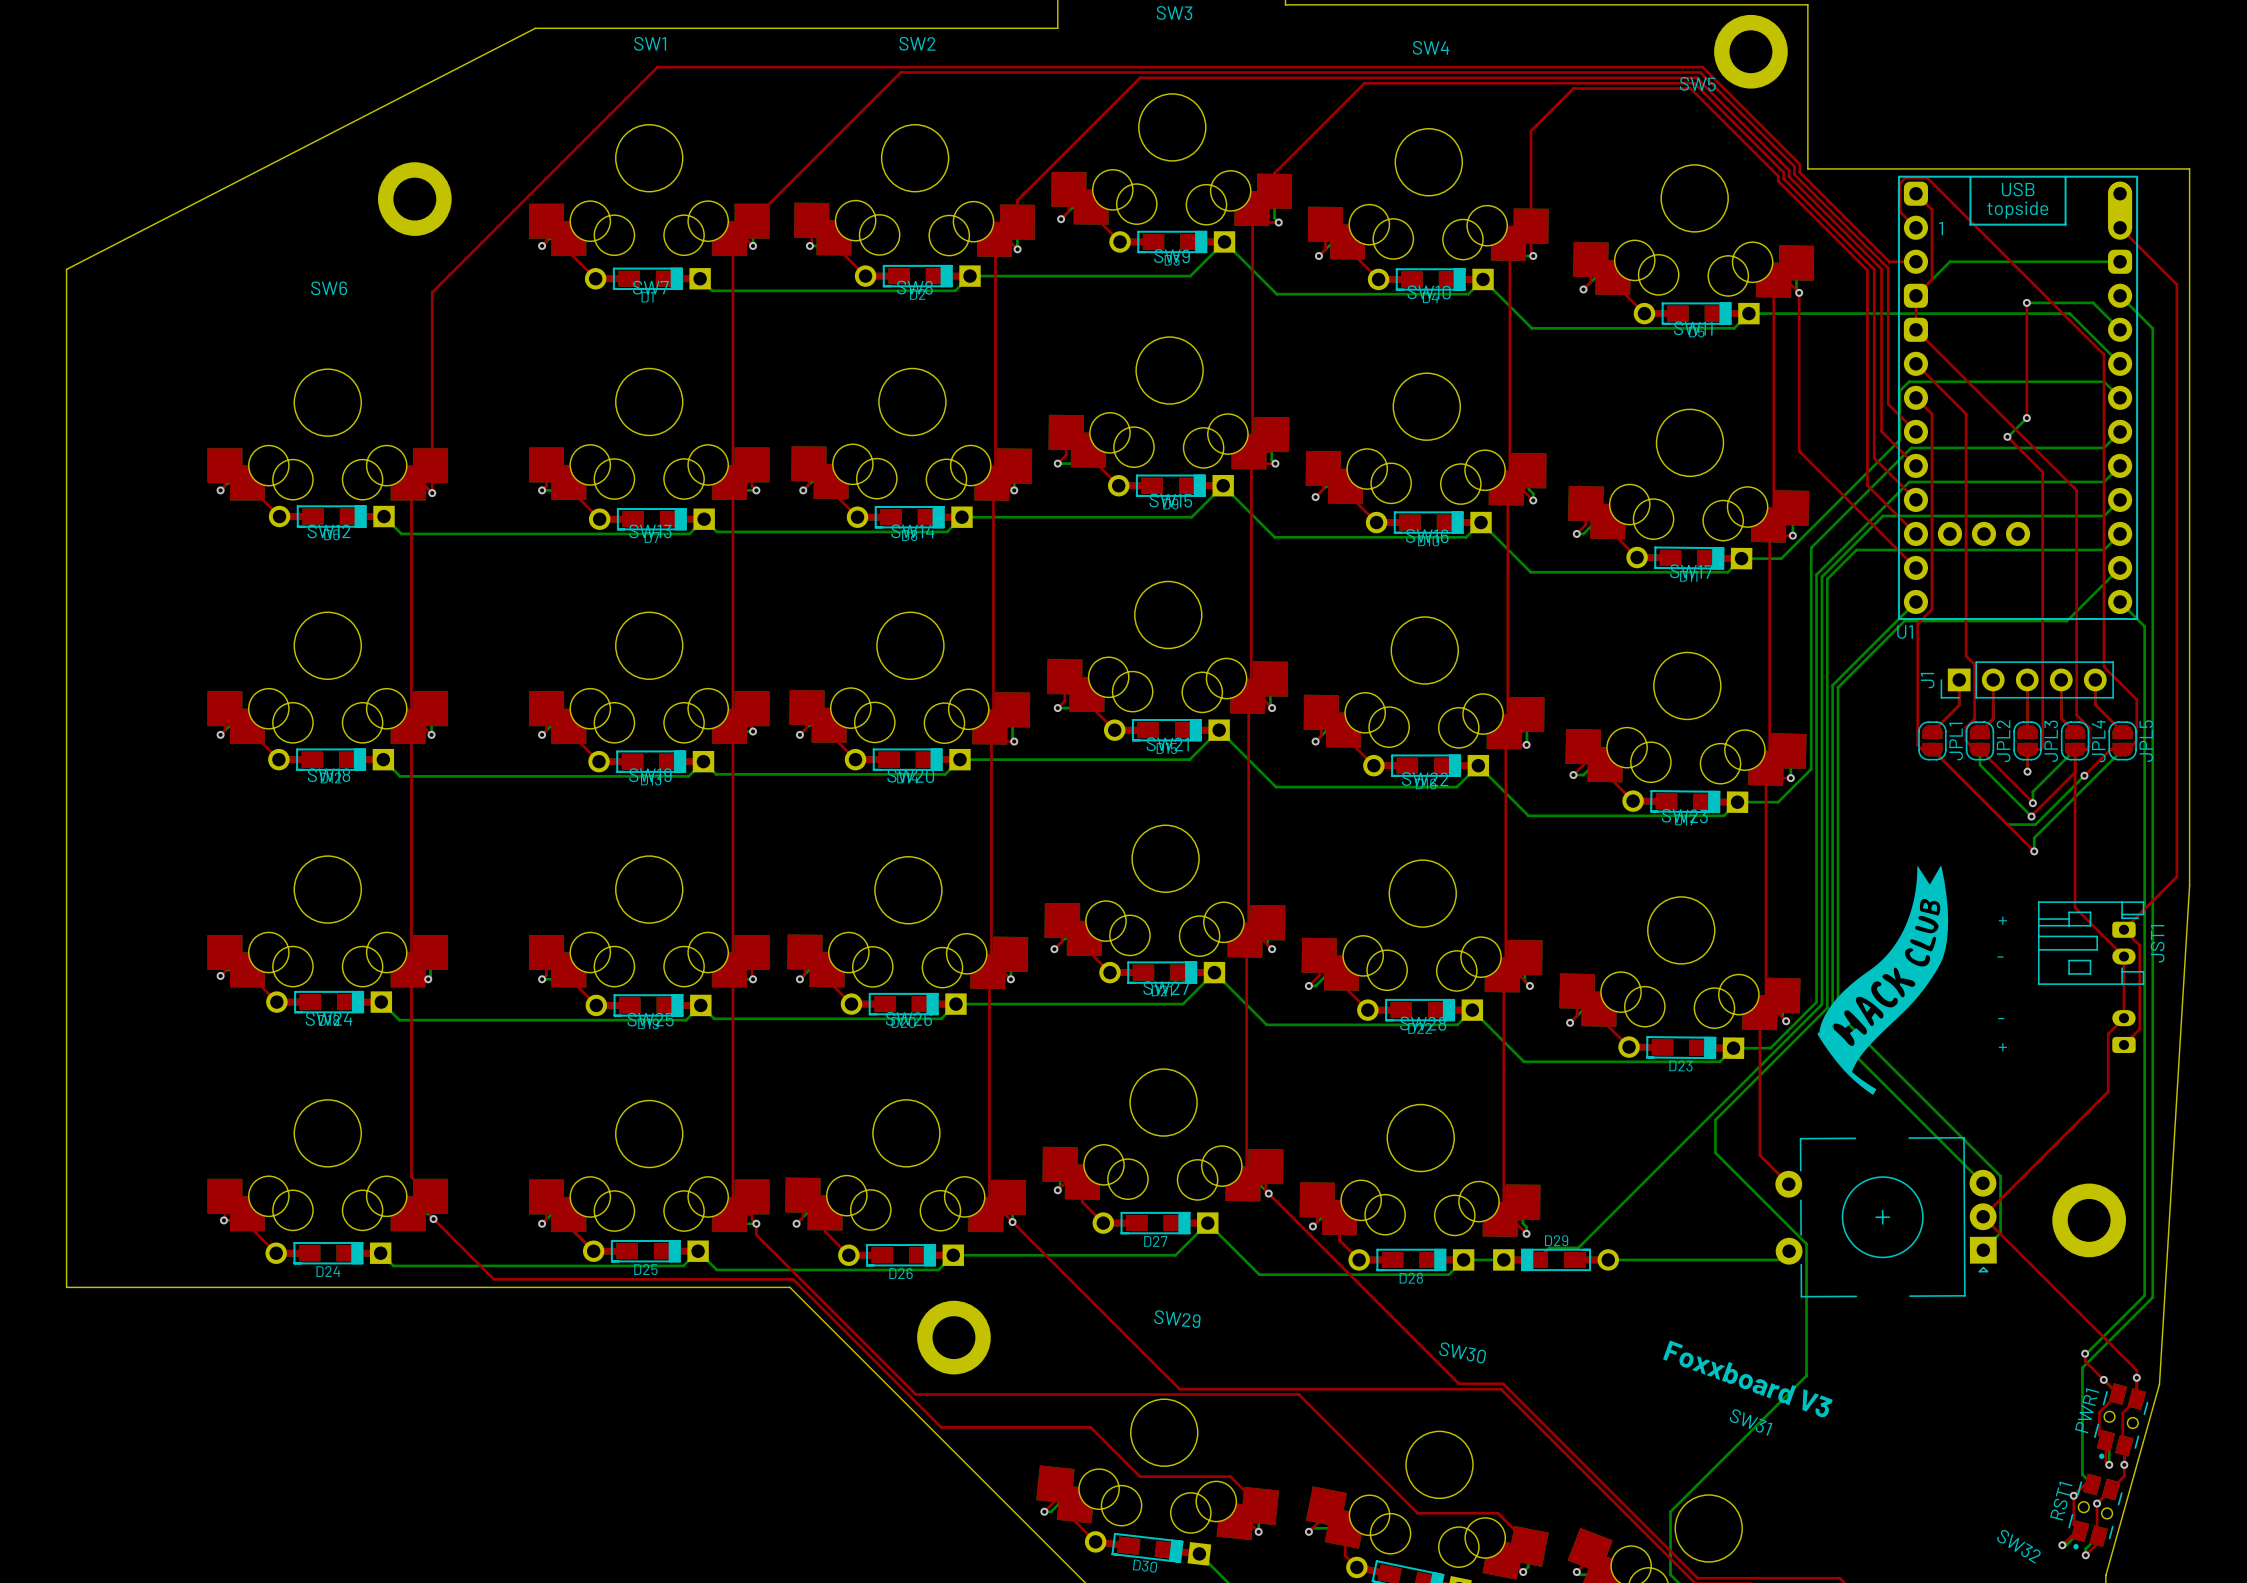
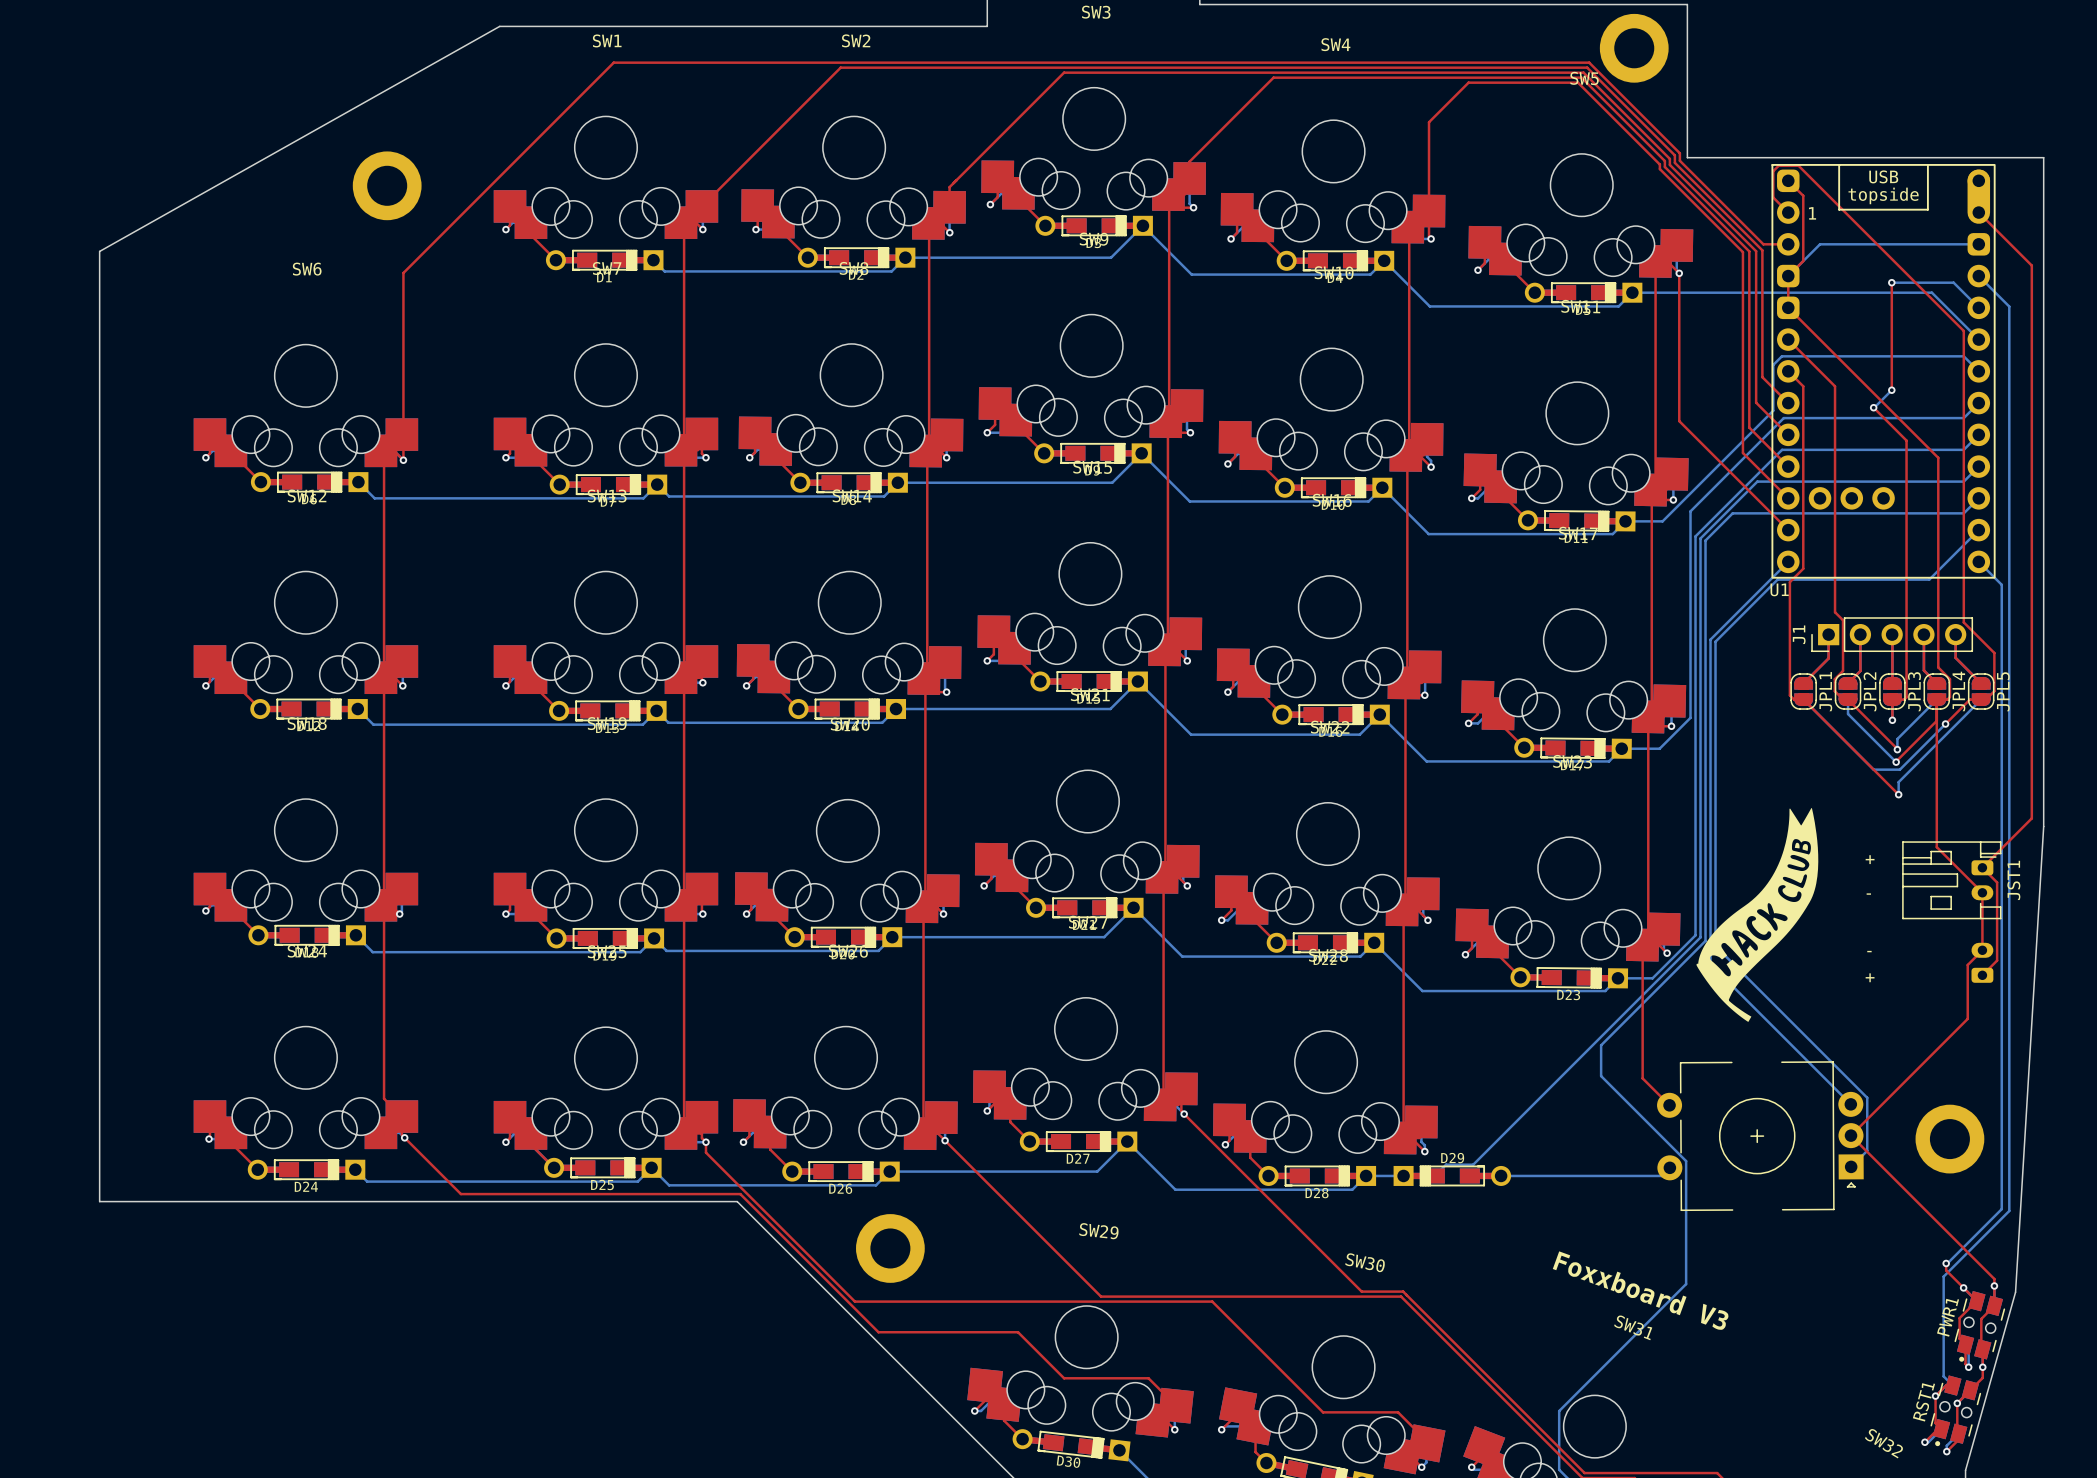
board edge: (535, 28) (66, 269) (66, 1287) (106, 1287) -> (499, 26) (99, 251) (99, 1201)

